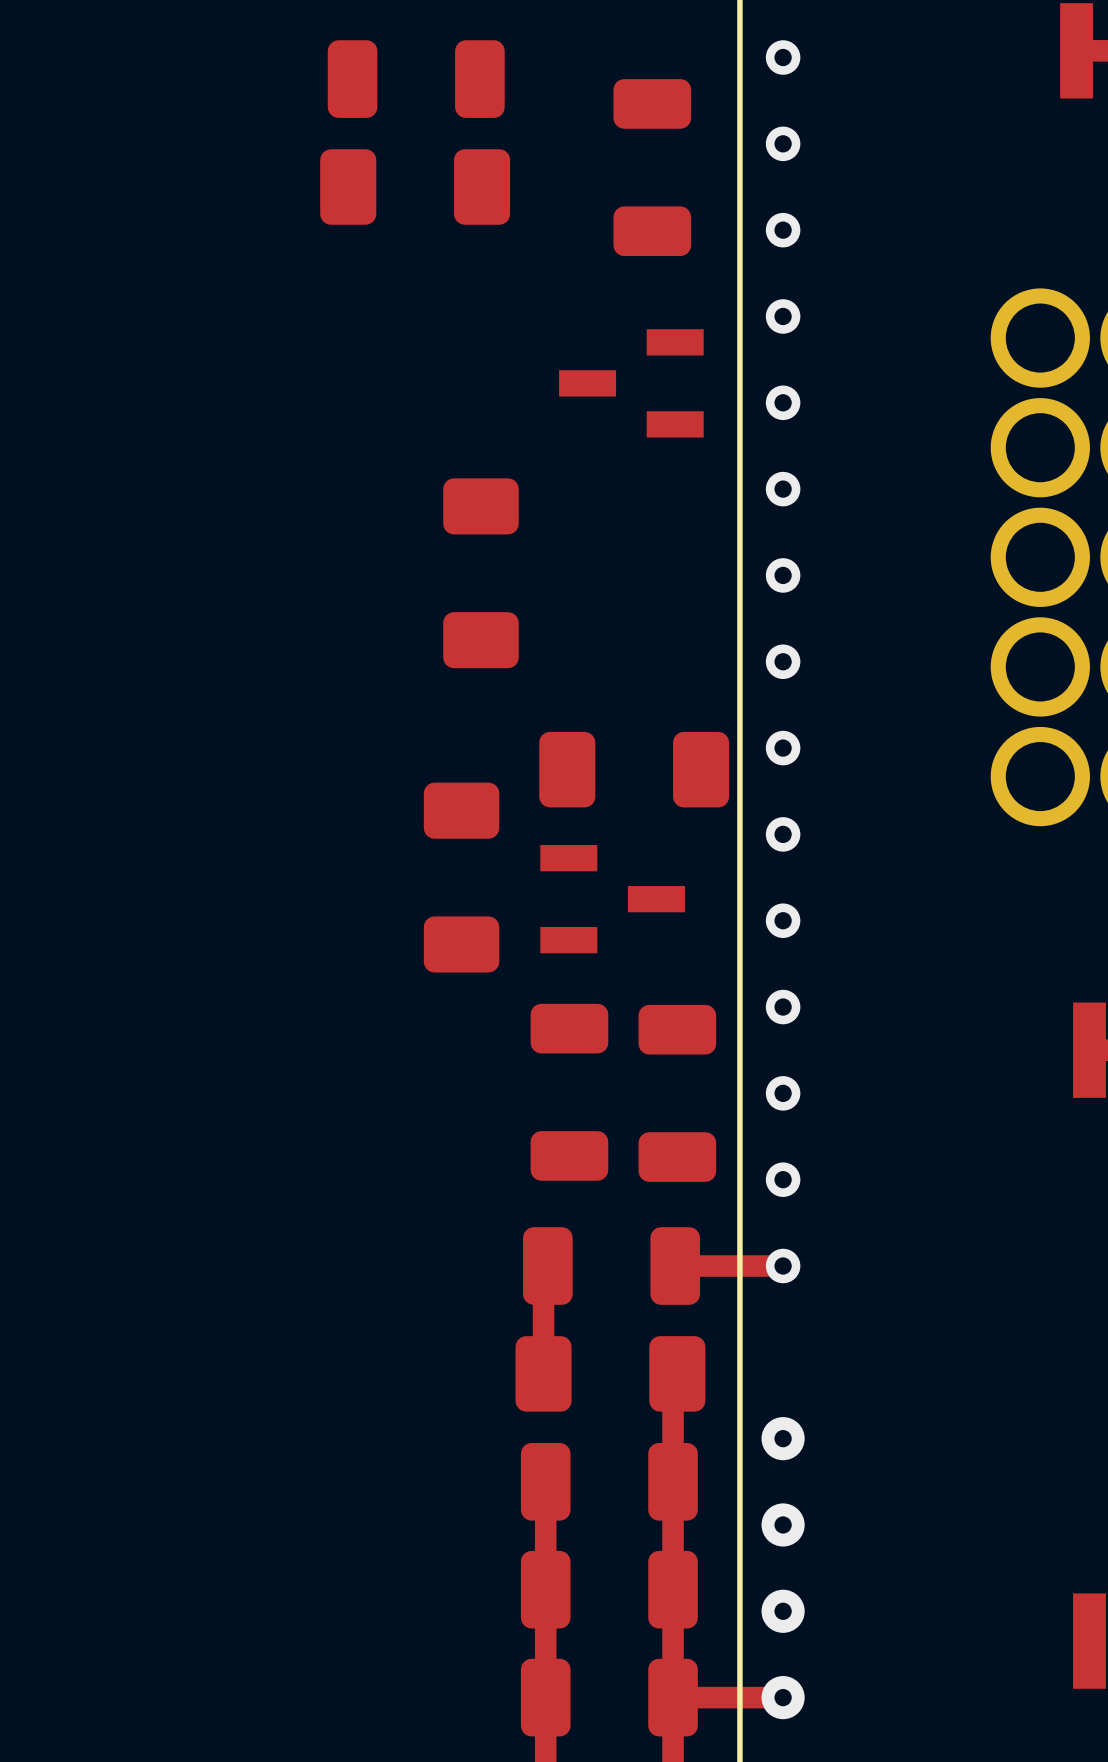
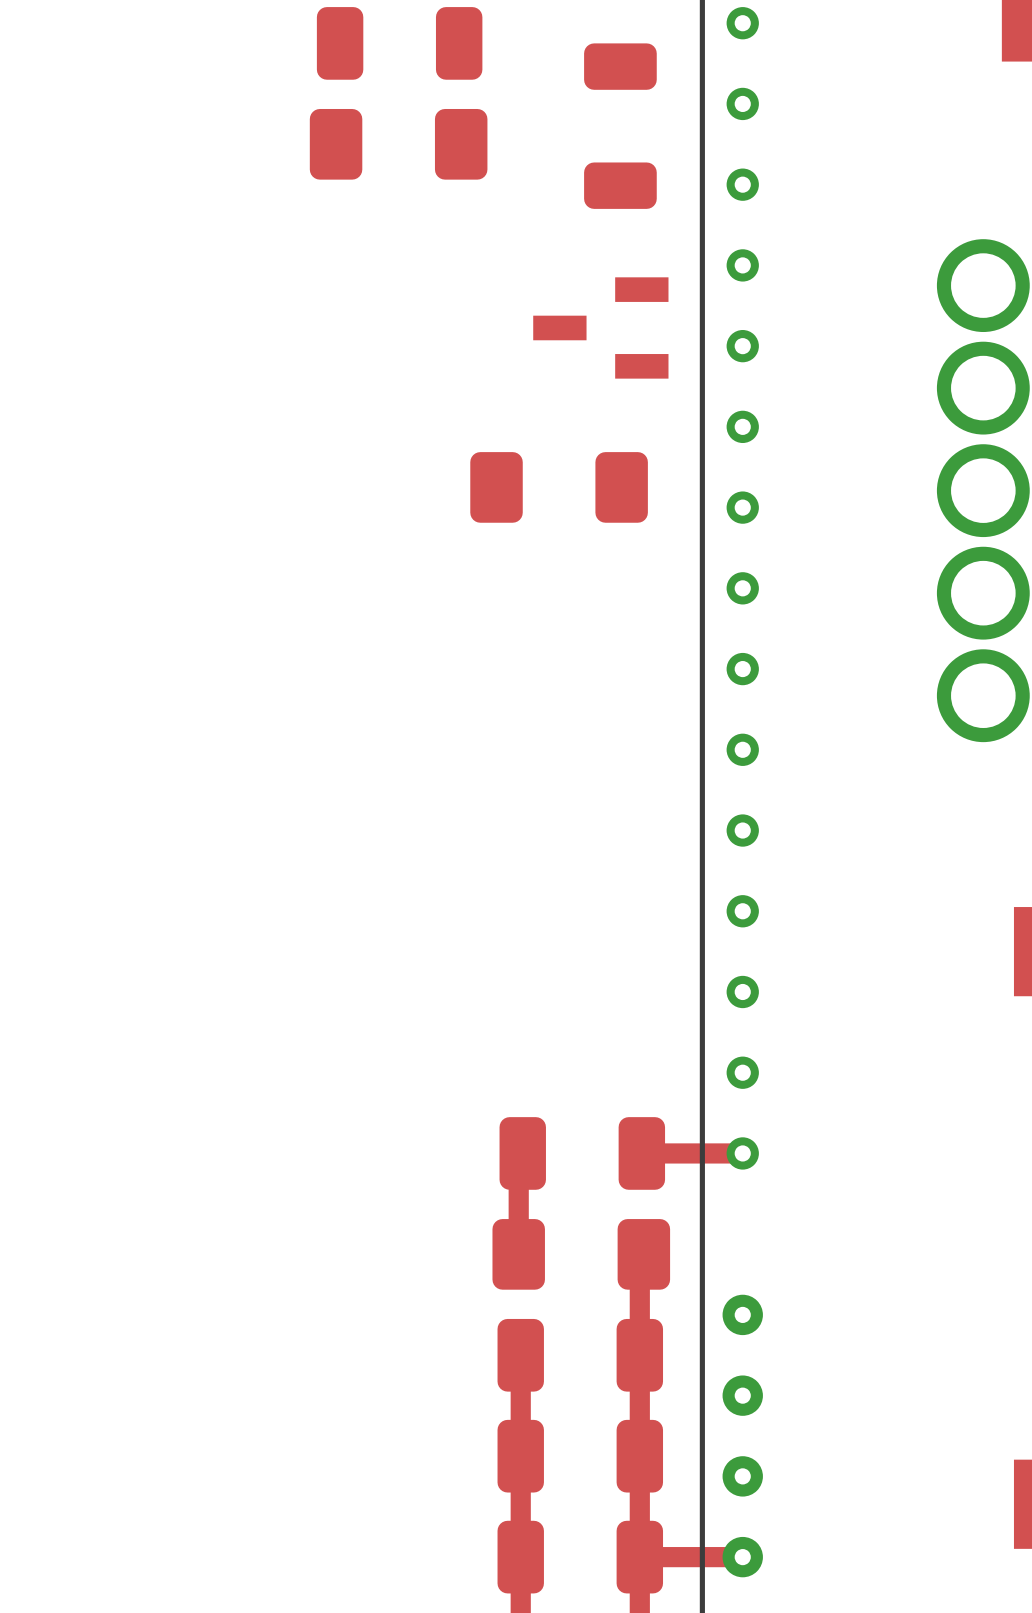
part rotation: 0° (480, 573) -> 90° clockwise (559, 487)
part: (634, 769) -> none
part: (461, 877) -> none
part: (612, 899) -> none
part: (569, 1092) -> none
part: (677, 1093) -> none

